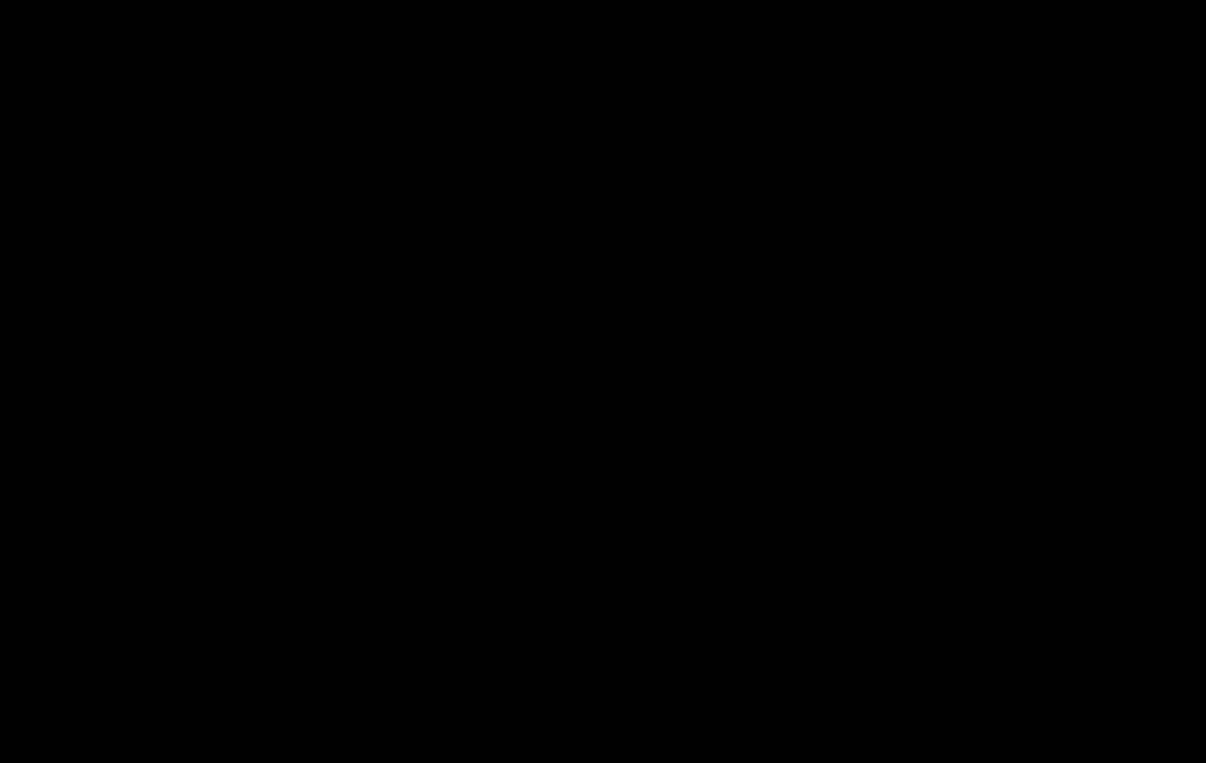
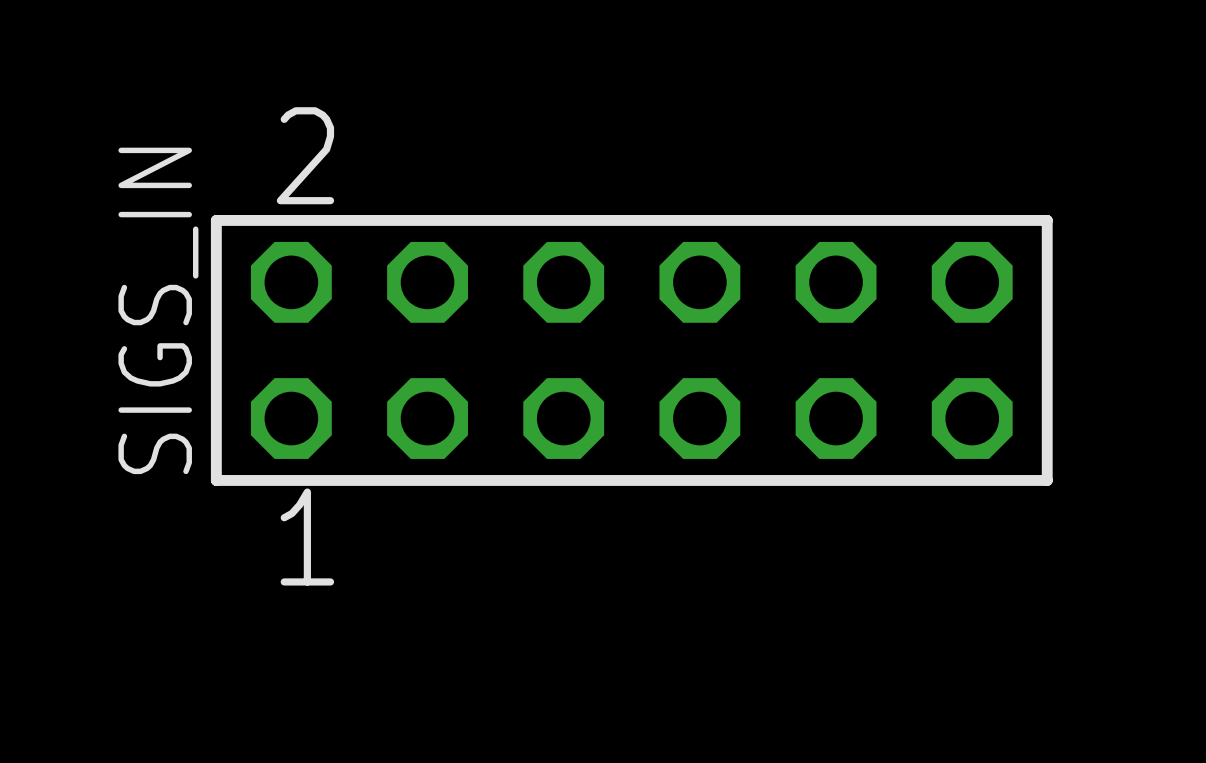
SIGS_IN: none -> (631, 350)

